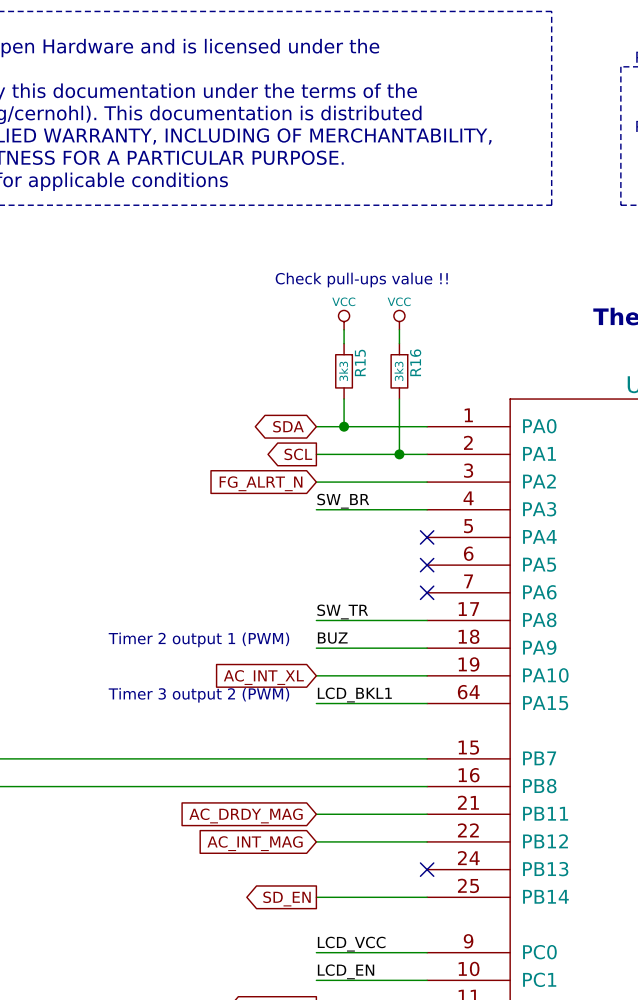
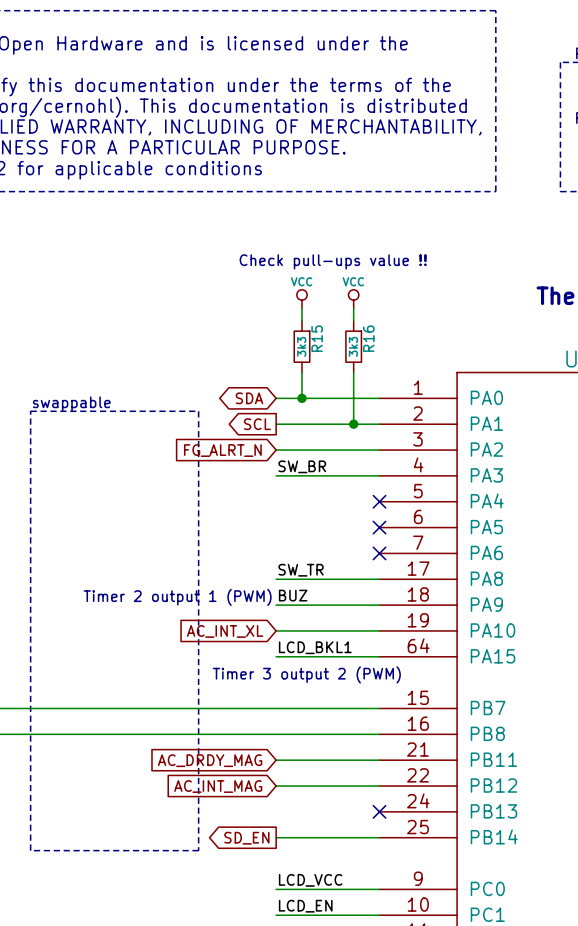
text: none -> swappable (71, 404)
line: none -> (30, 411) (198, 411) (198, 850) (30, 850) (30, 411)
text position: Timer 3 output 2 (PWM) (198, 695) -> Timer 3 output 2 (PWM) (306, 674)

